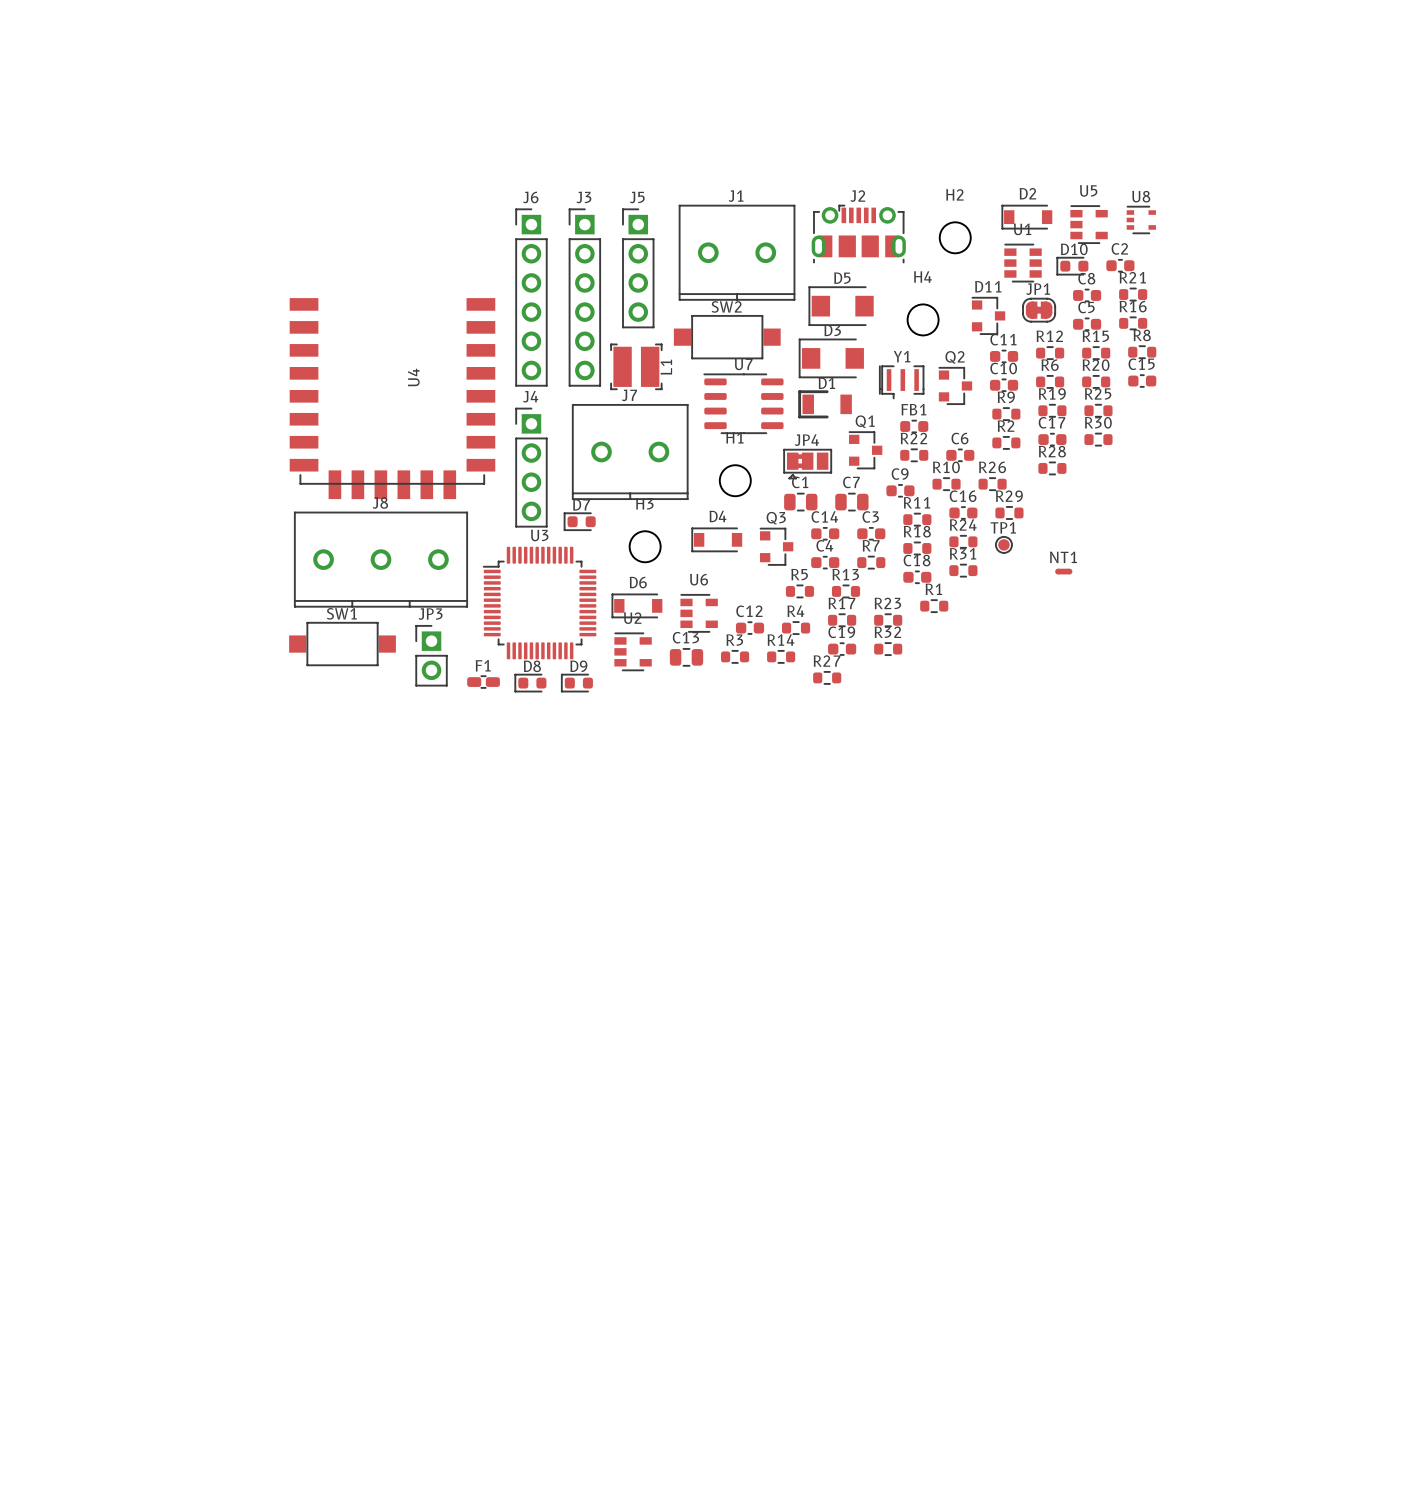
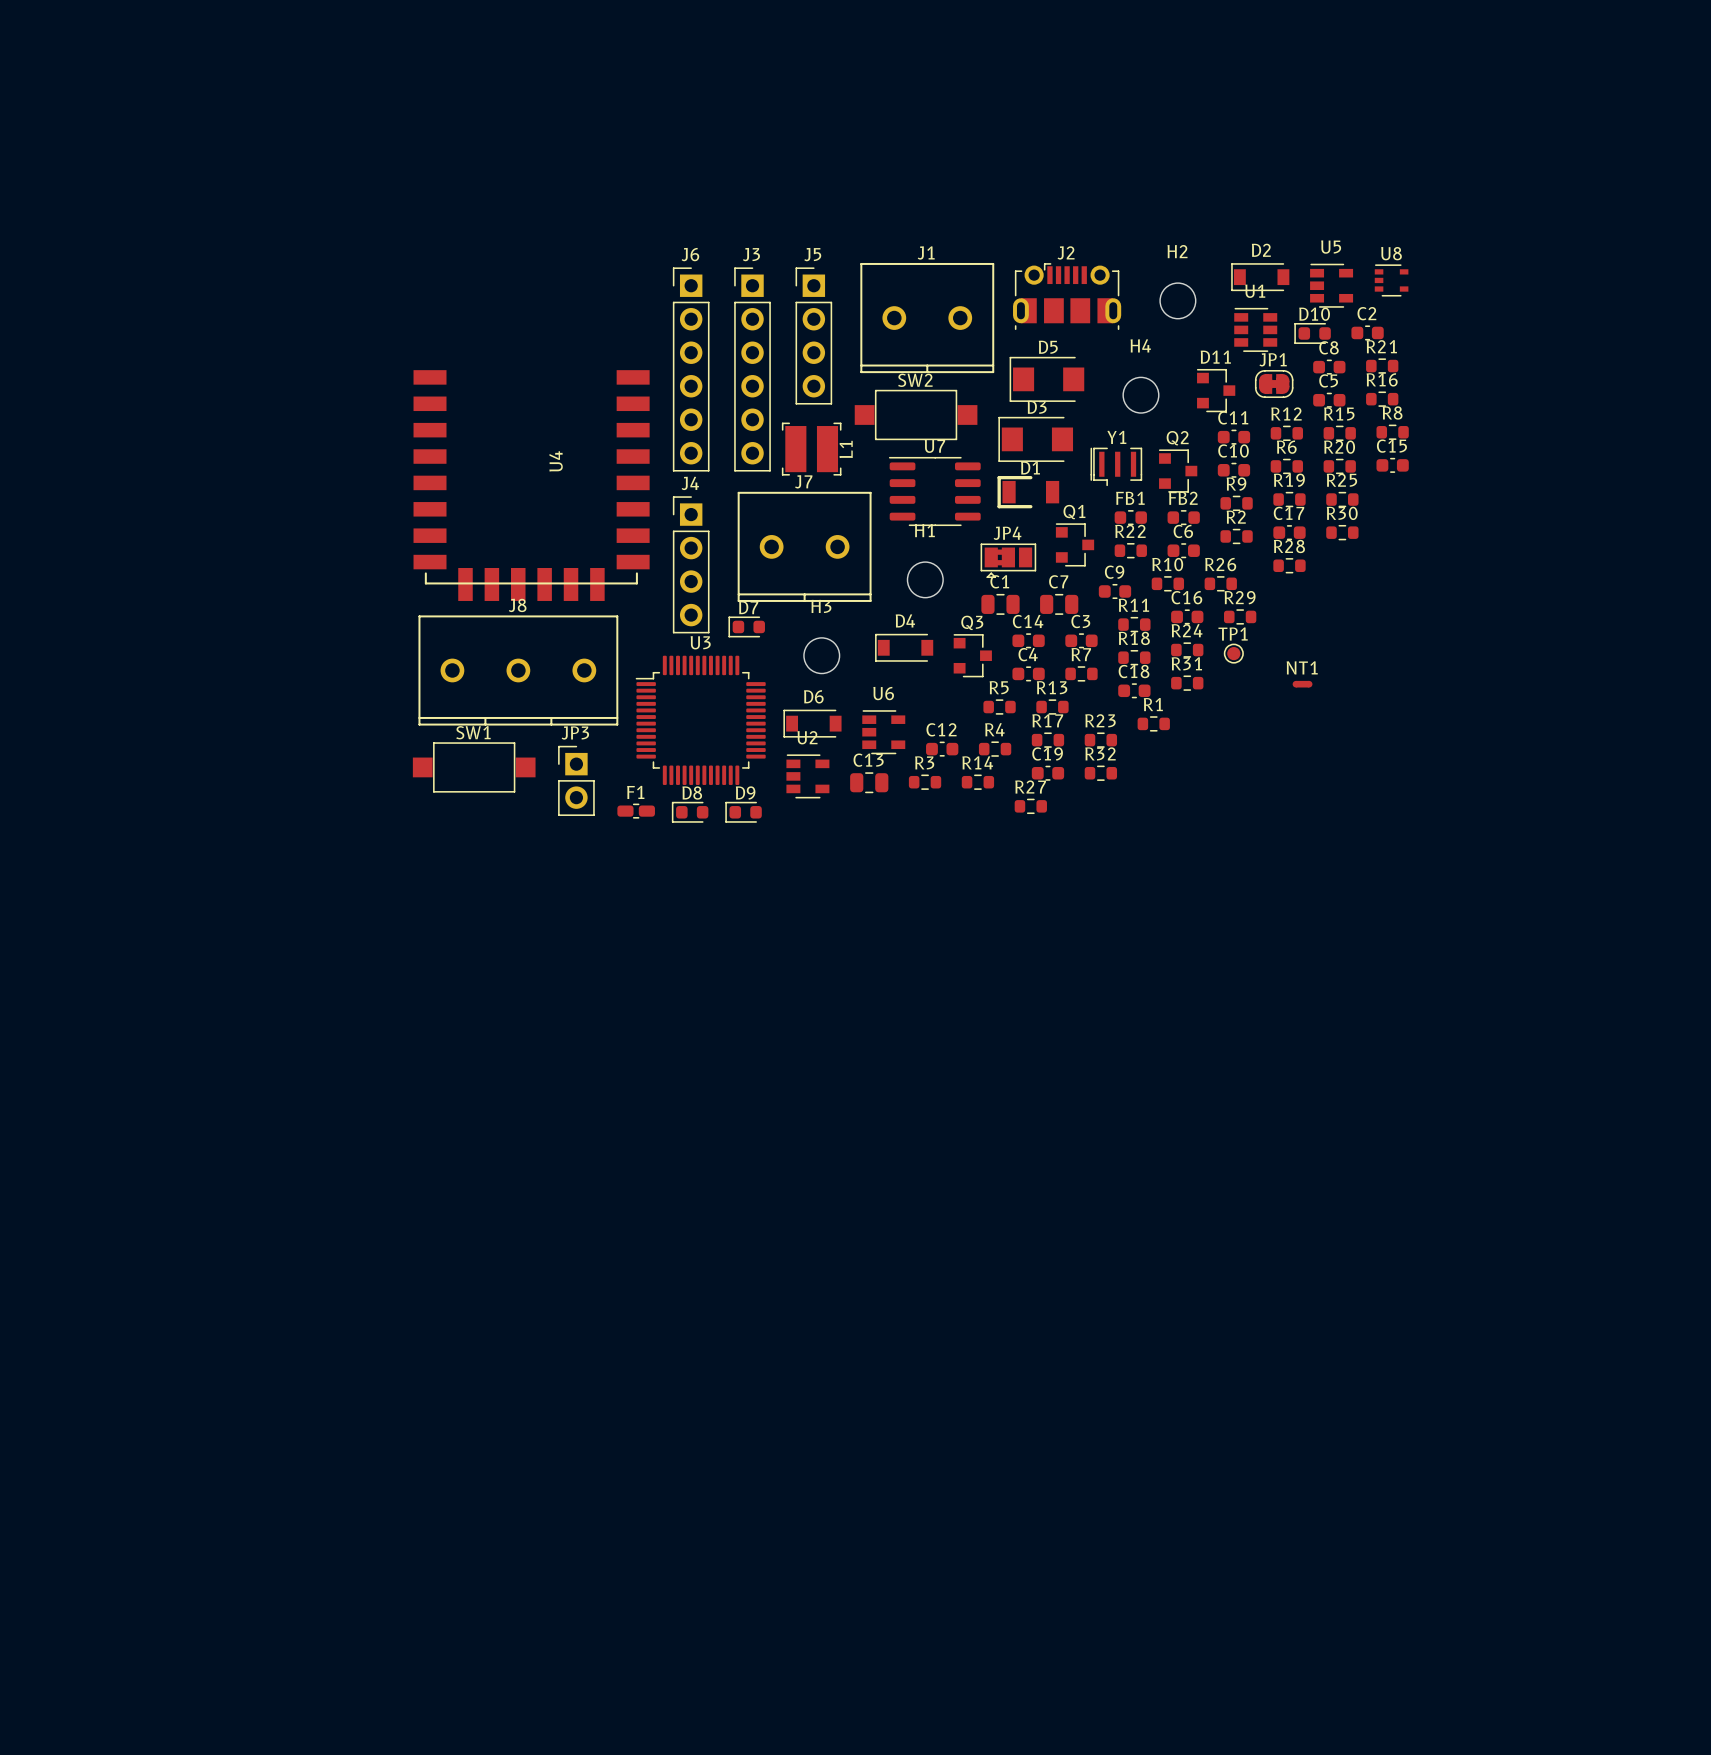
FB2: none -> (1183, 517)

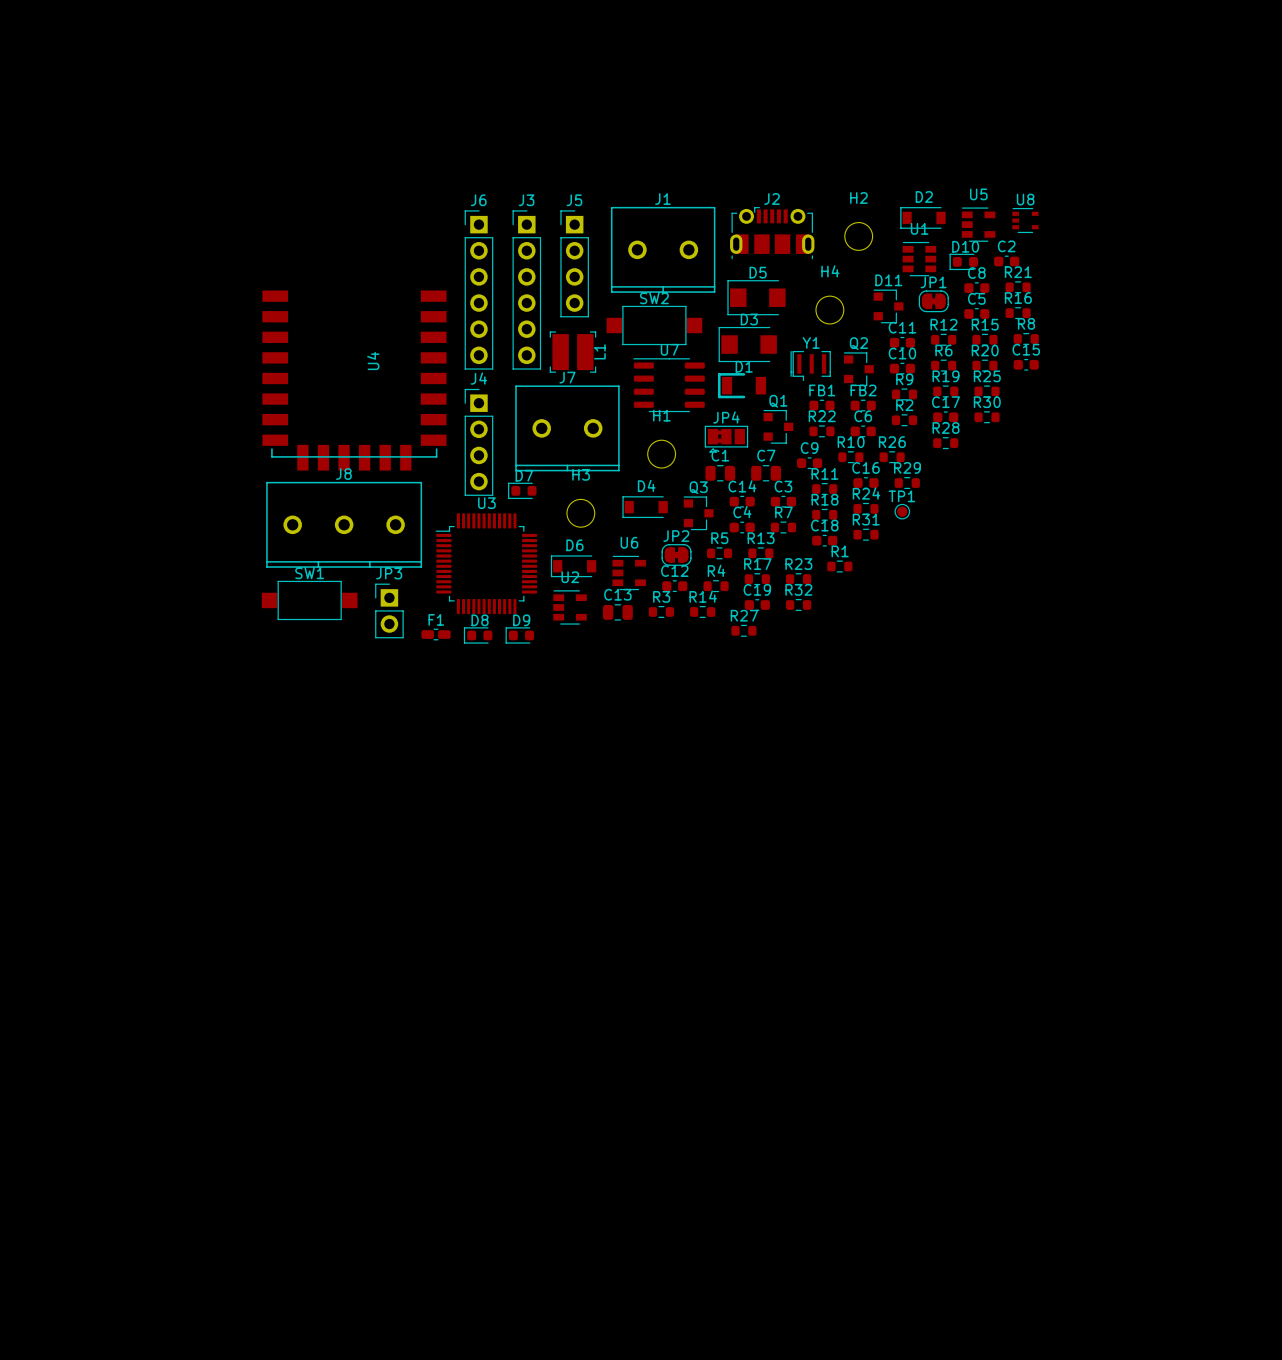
NT1: (1302, 684) -> none
JP2: none -> (676, 554)

